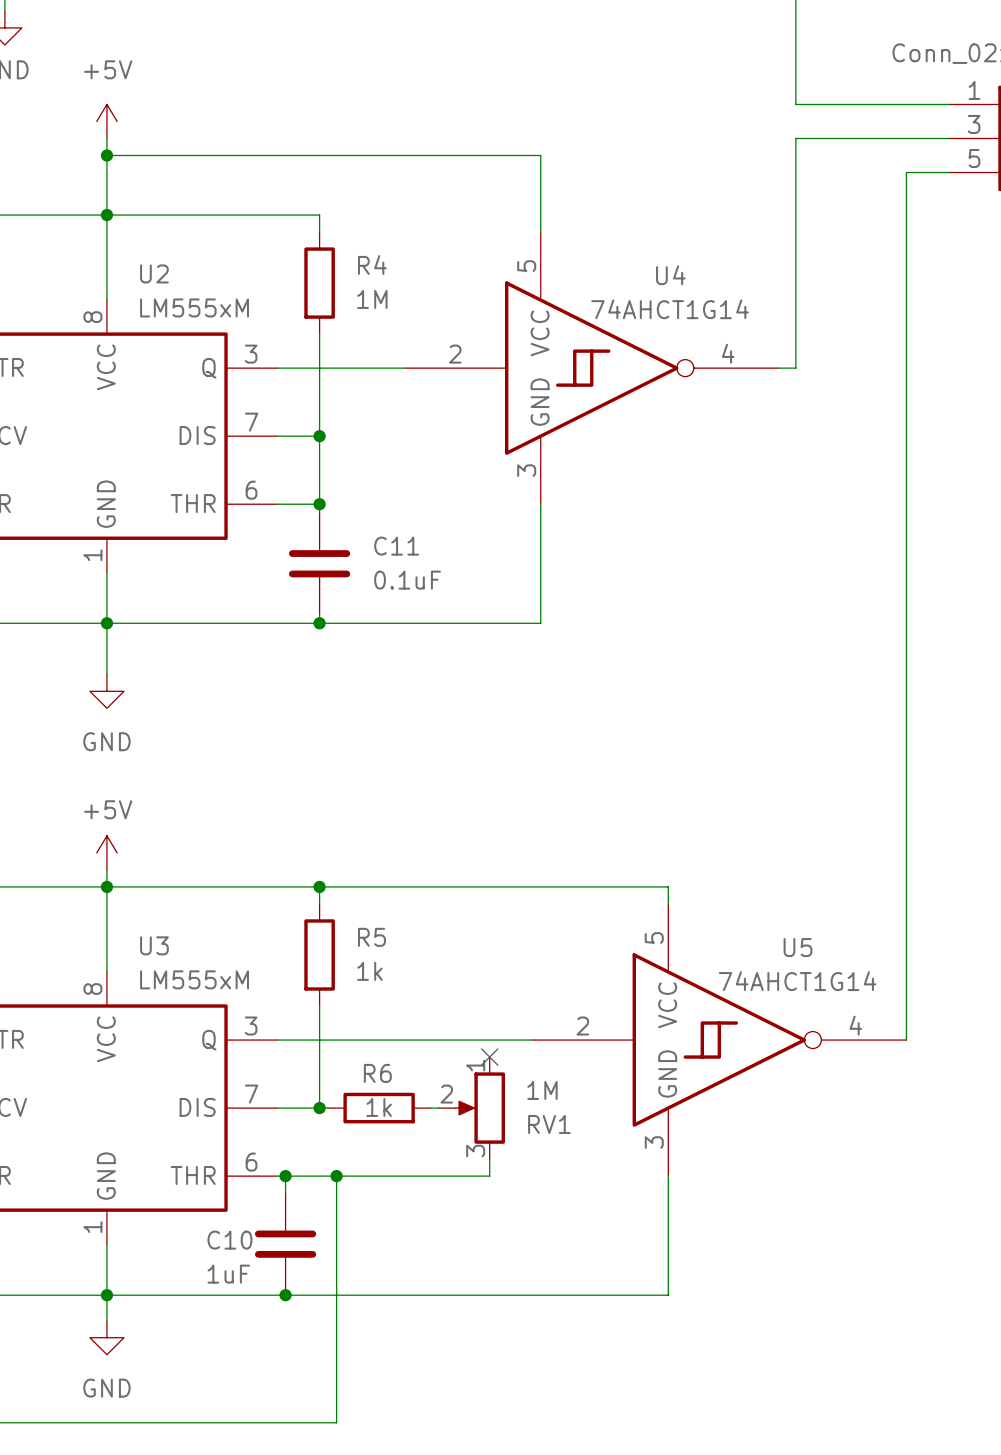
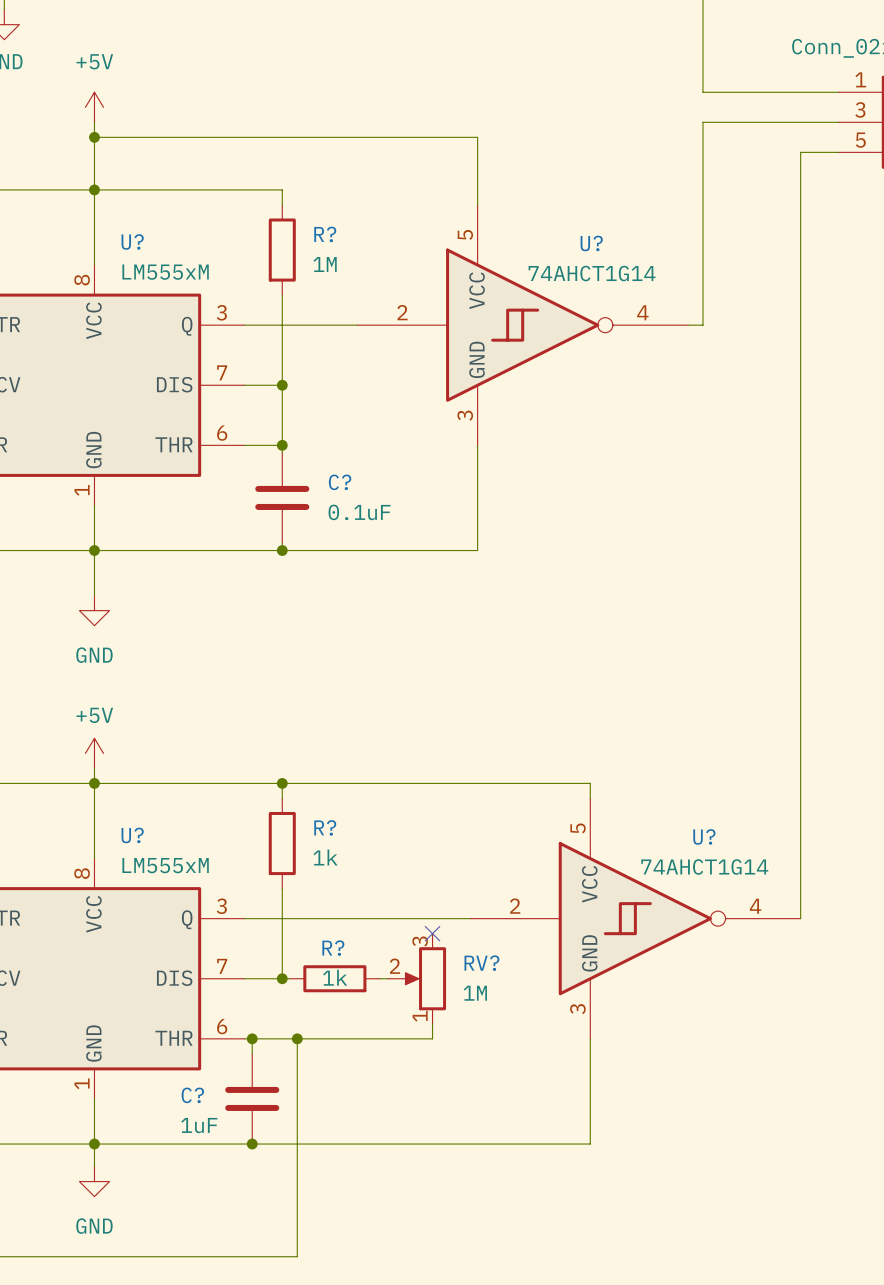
R4 name: R4 (372, 265) -> R? (325, 234)
U2 name: U2 (154, 273) -> U? (132, 241)
U4 name: U4 (670, 275) -> U? (591, 243)
C11 name: C11 (396, 546) -> C? (340, 482)
R5 name: R5 (371, 937) -> R? (325, 827)
U3 name: U3 (154, 945) -> U? (132, 835)
U5 name: U5 (797, 947) -> U? (704, 836)
R6 name: R6 (377, 1073) -> R? (333, 948)
RV1 flip: as is (480, 1108) -> up-down (424, 978)
RV1 name: RV1 (549, 1124) -> RV? (481, 963)
C10 name: C10 (229, 1240) -> C? (192, 1095)

